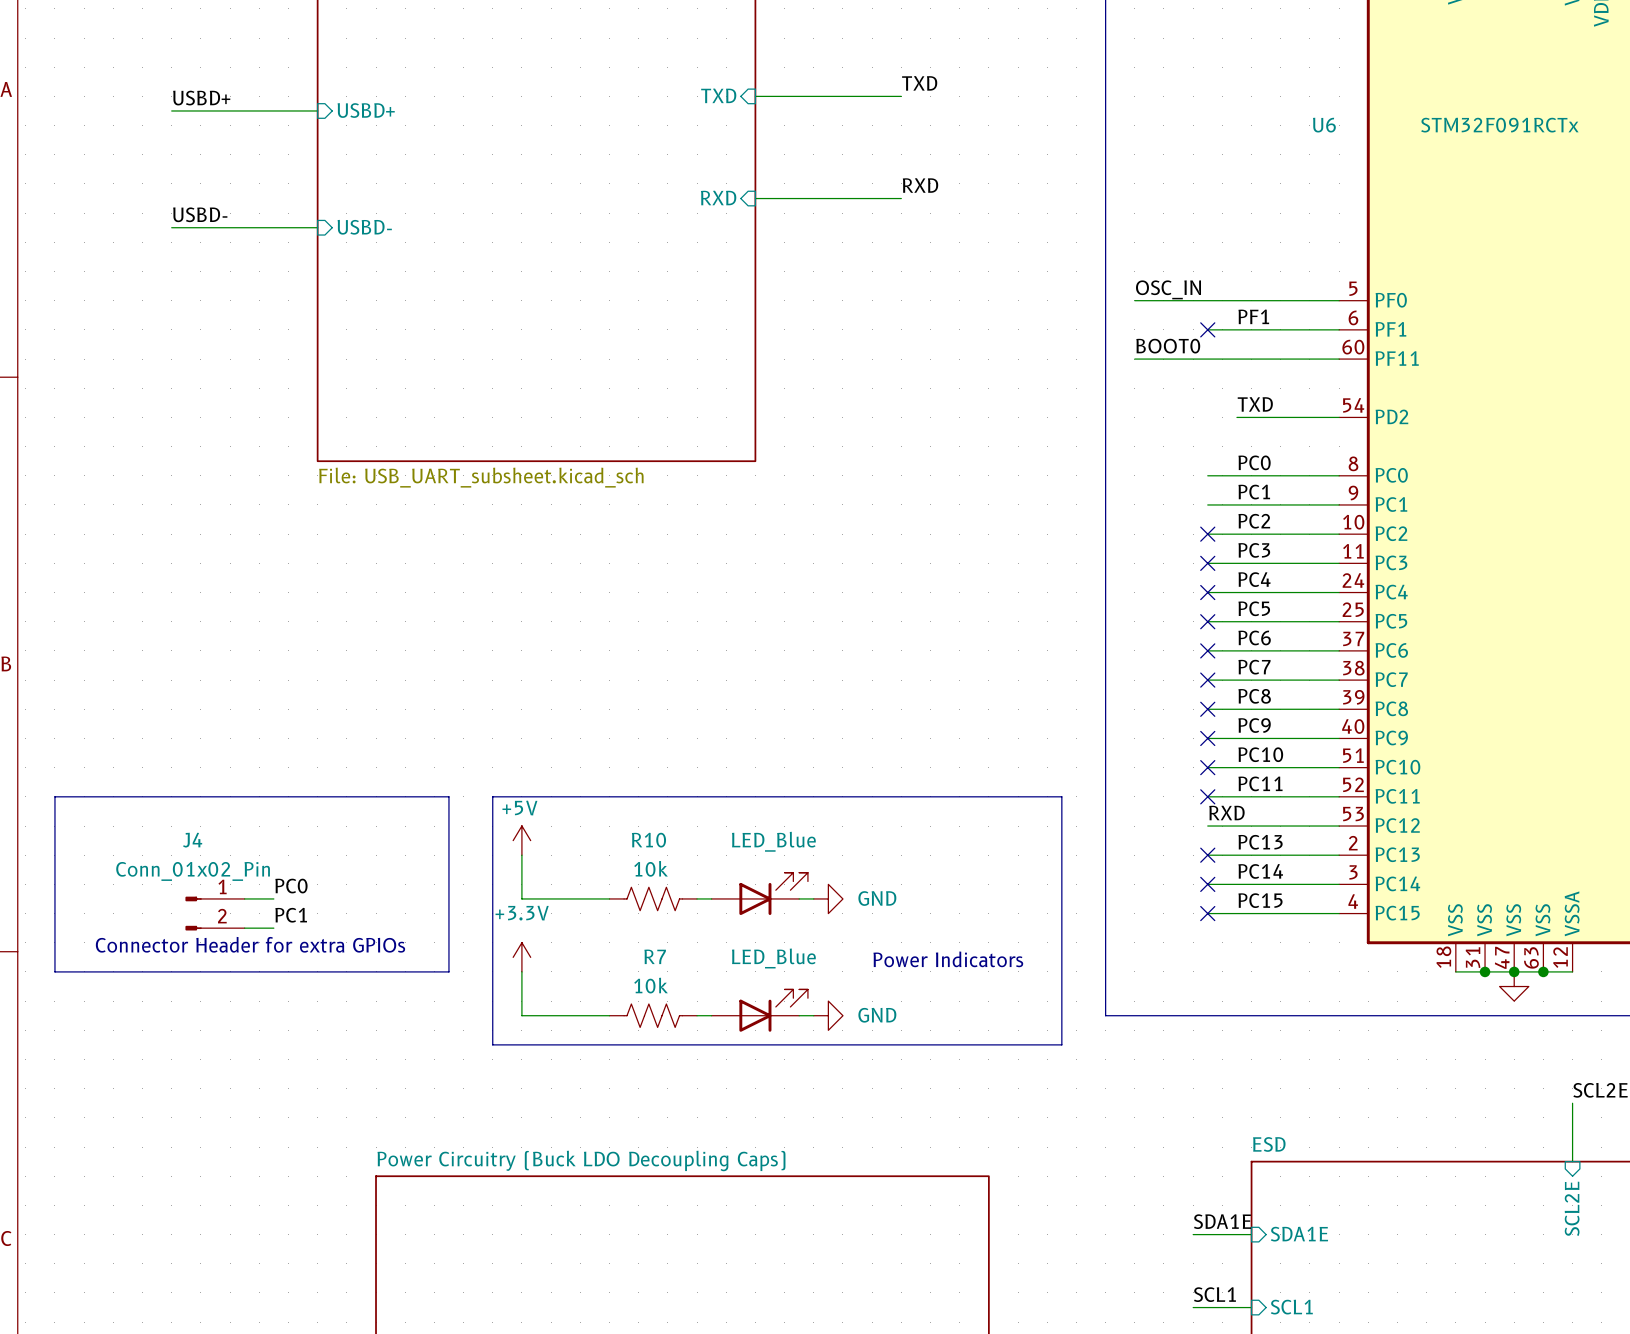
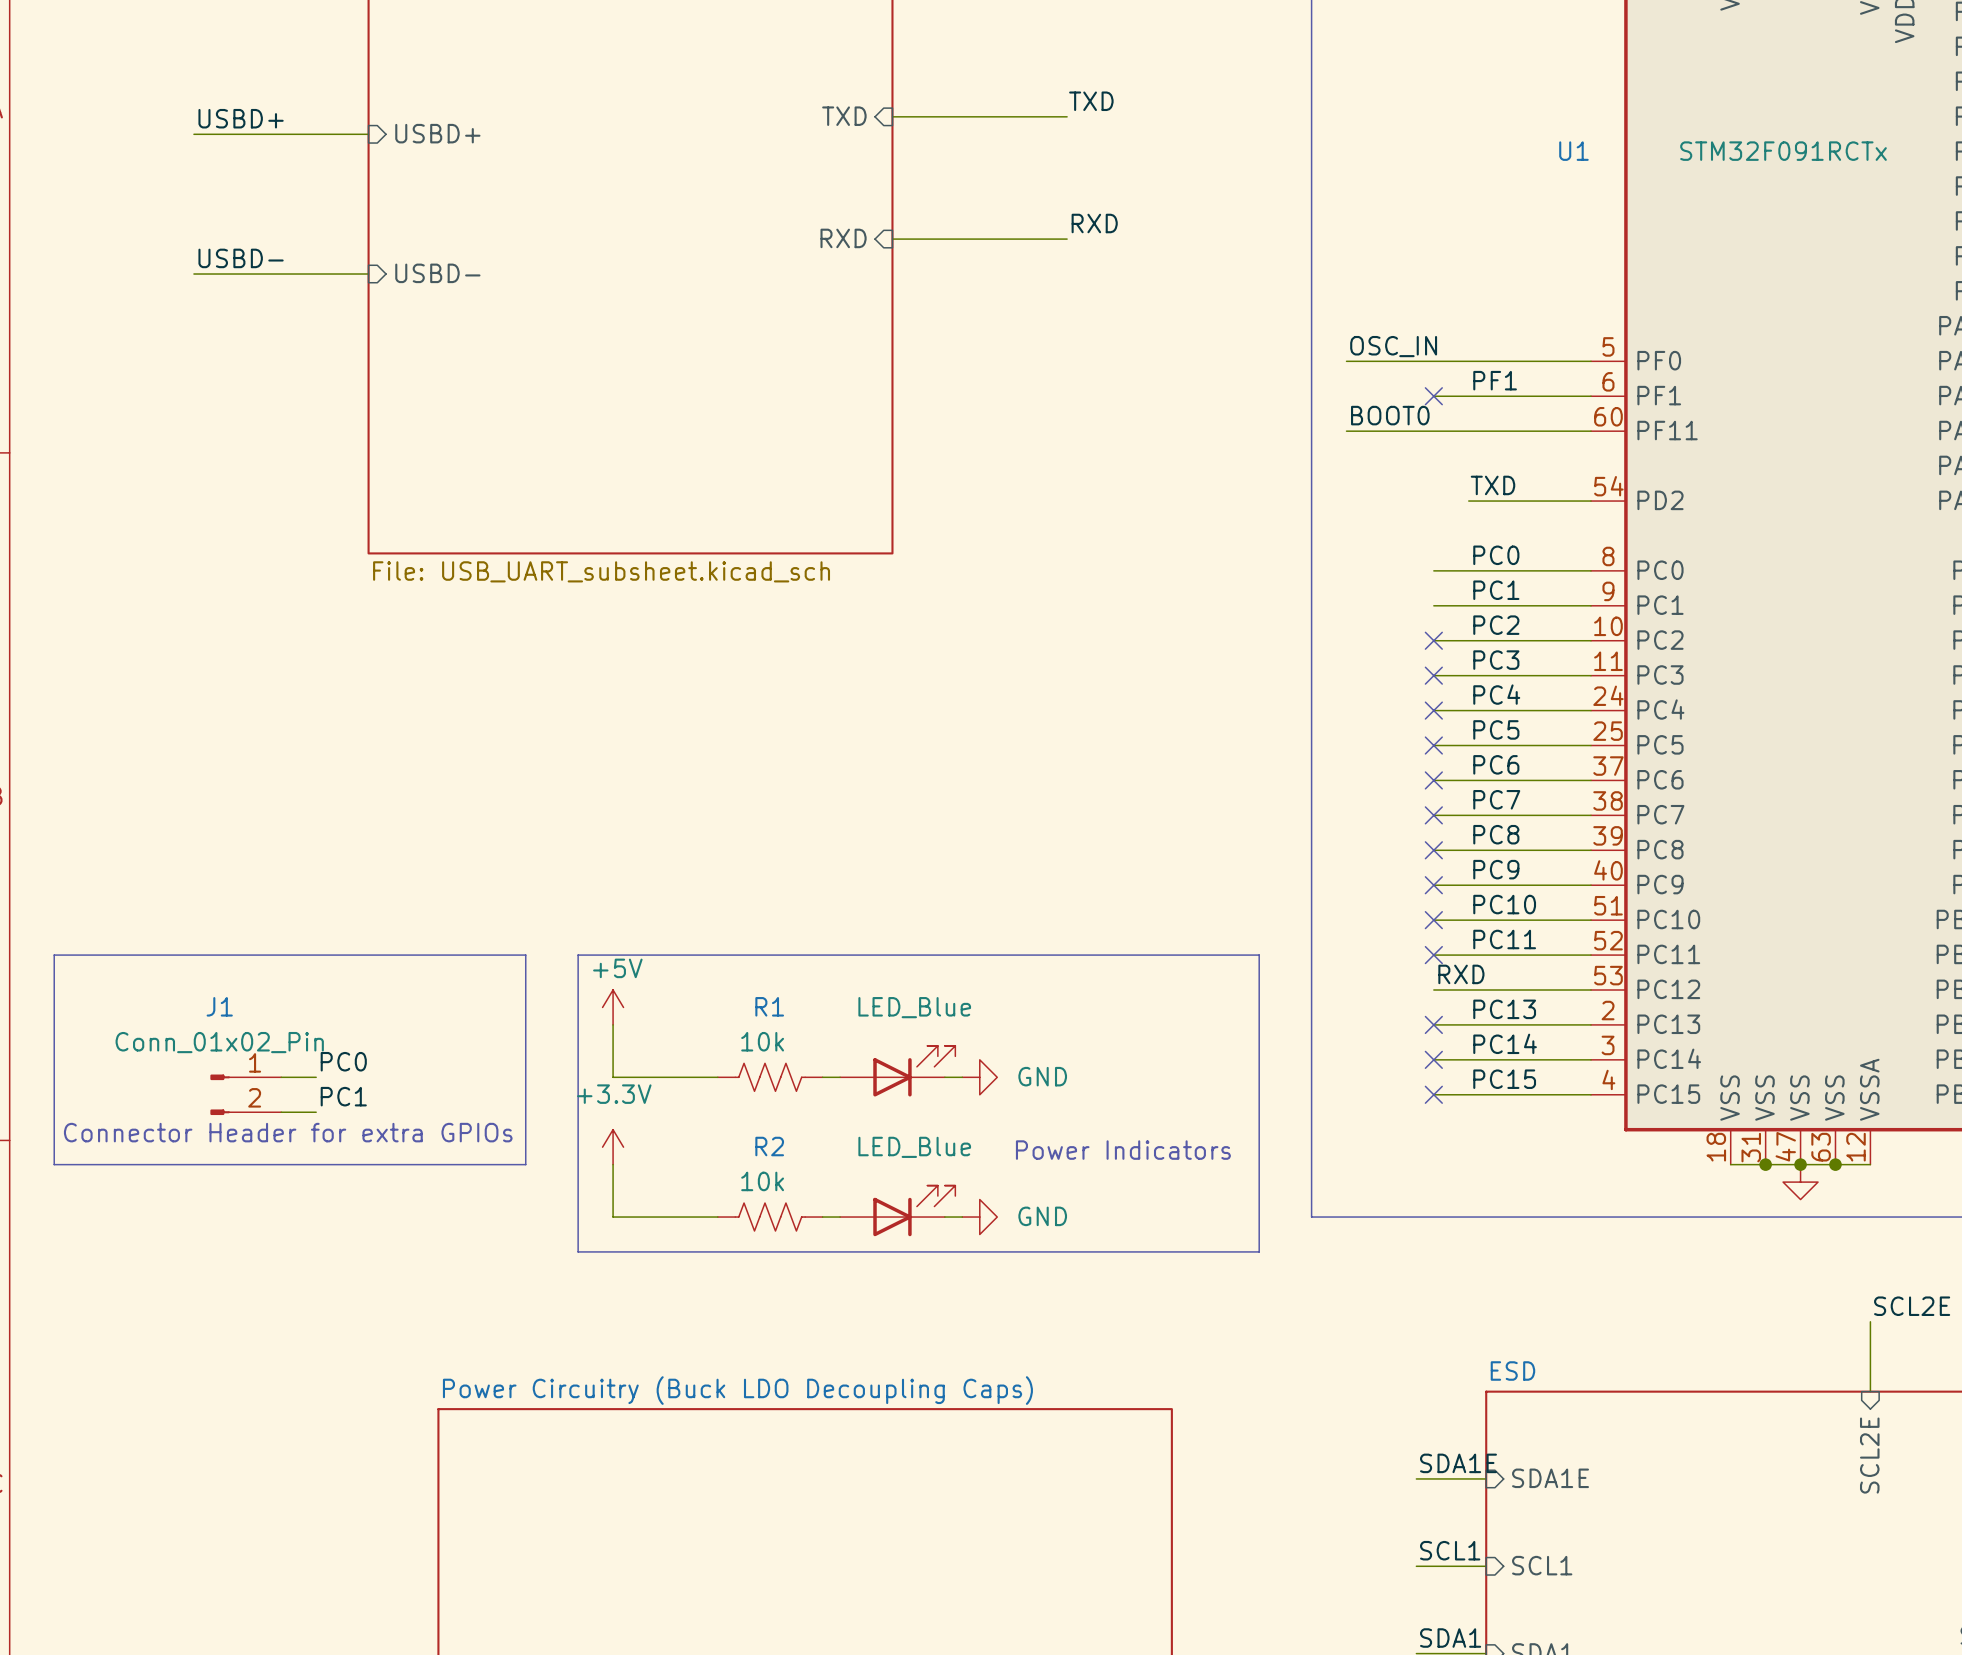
U6 name: U6 (1324, 125) -> U1 (1573, 151)
J4 name: J4 (192, 840) -> J1 (219, 1006)
R10 name: R10 (648, 840) -> R1 (769, 1006)
R7 name: R7 (655, 956) -> R2 (769, 1146)

